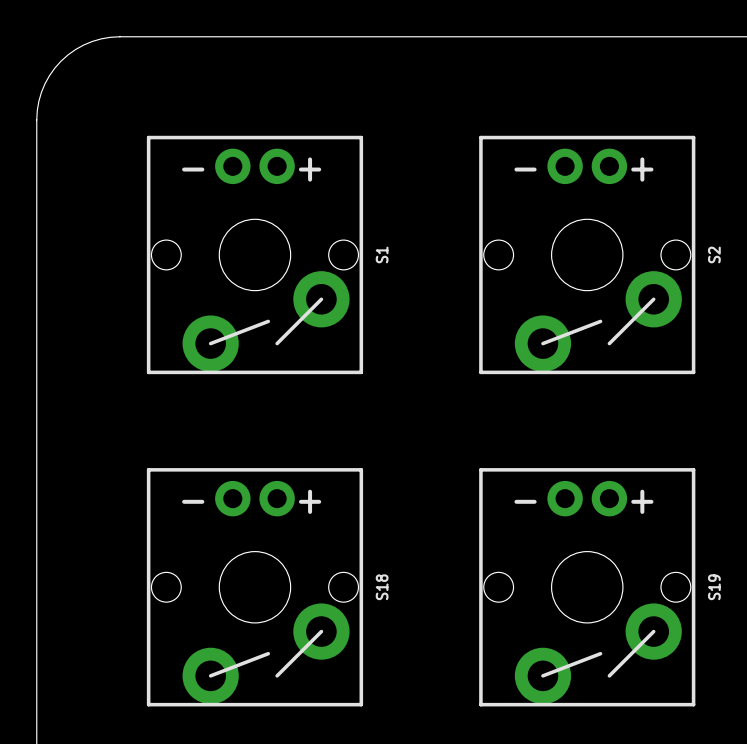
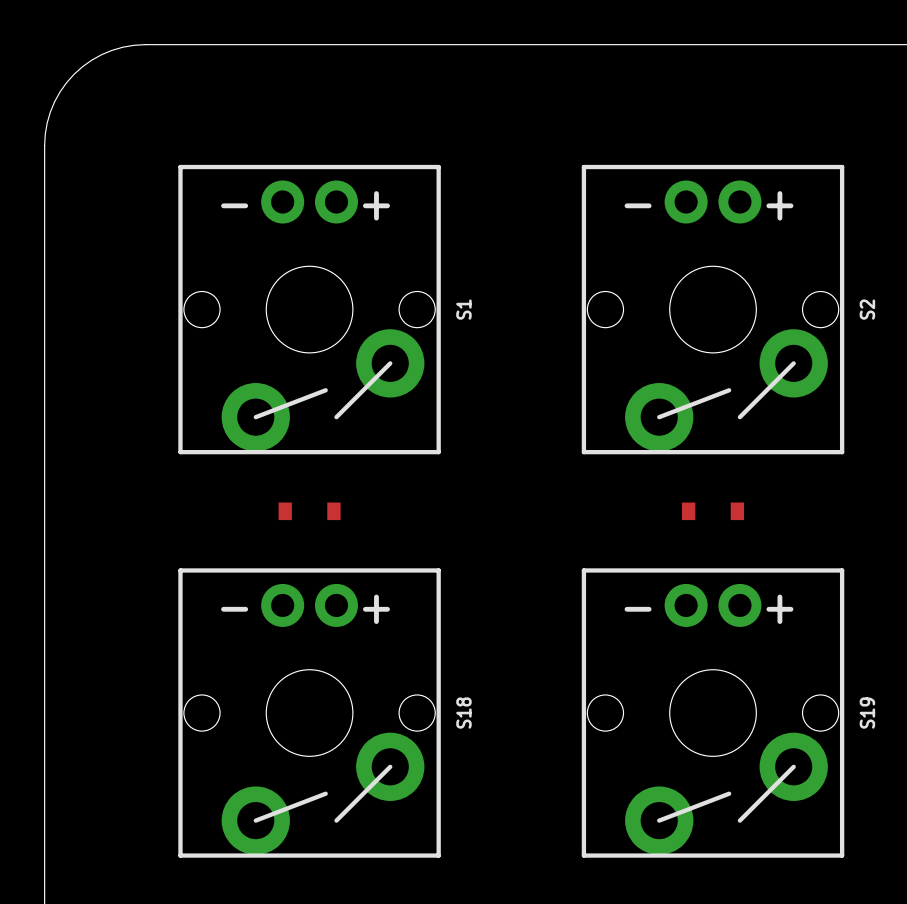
part: none -> (309, 511)
part: none -> (713, 511)

